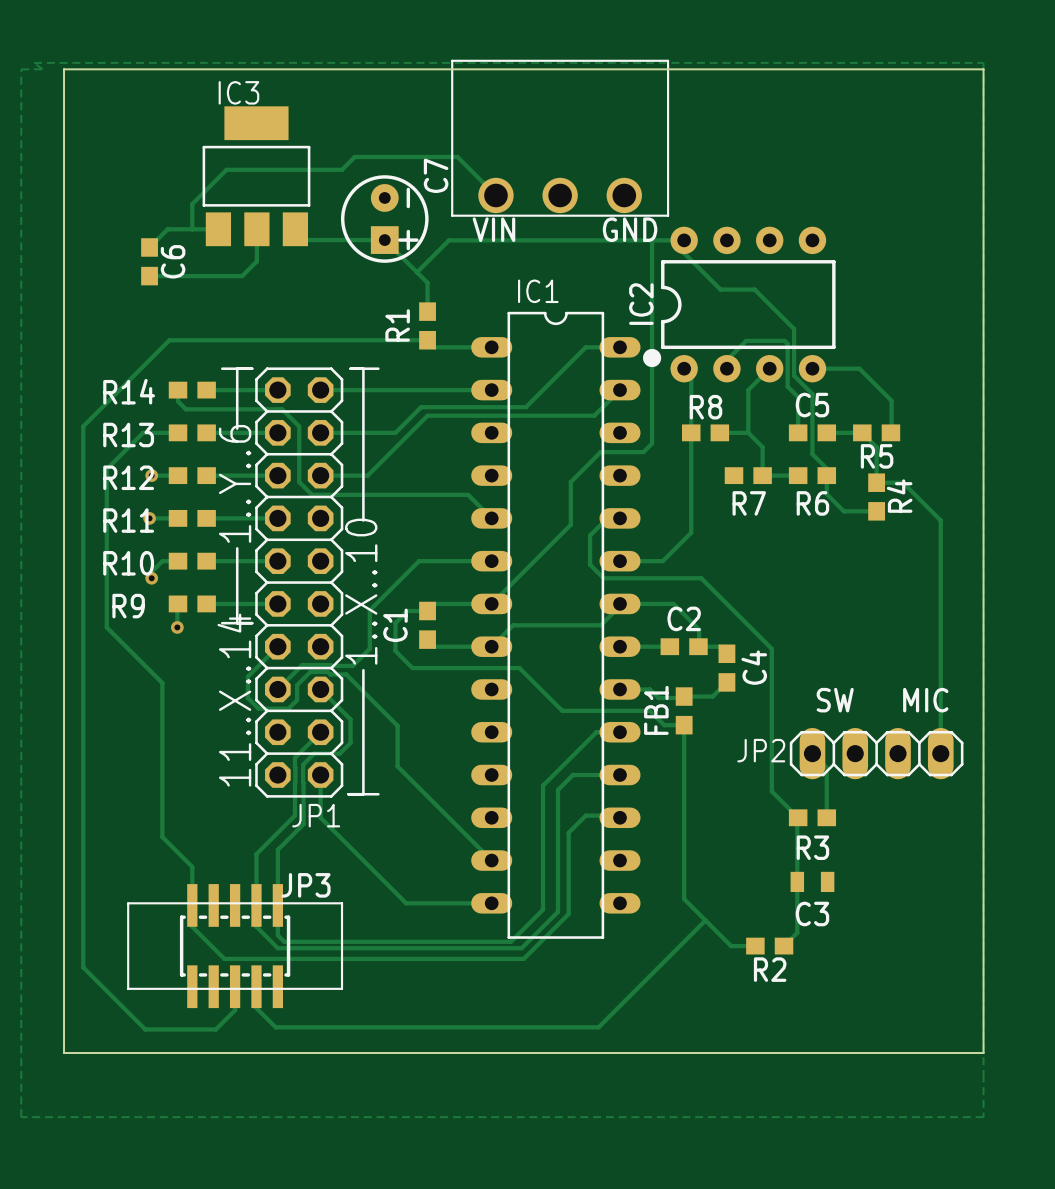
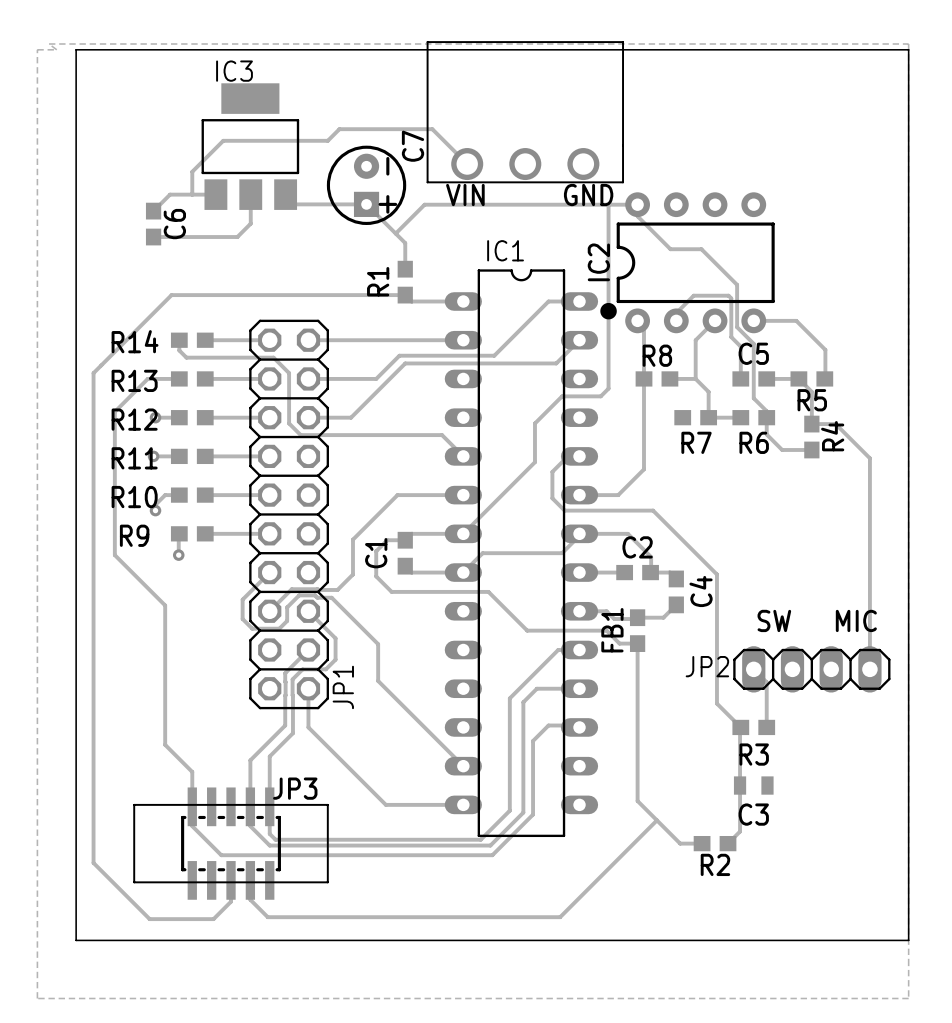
line: (222, 368) (252, 368) -> none
line: (237, 368) (237, 428) -> none
line: (350, 368) (378, 368) -> none
line: (363, 368) (363, 520) -> none
text: 1..Y..6 (235, 483) -> none
line: (237, 548) (237, 623) -> none
text: 1..X..10 (361, 591) -> none
line: (222, 623) (252, 623) -> none
line: (363, 670) (363, 794) -> none
text: 11..X..14 (234, 700) -> none
line: (348, 794) (378, 794) -> none
JP1 name rotation: 0° (316, 815) -> 90° counterclockwise (343, 687)
JP1 name position: JP1 (316, 815) -> JP1 (343, 687)

